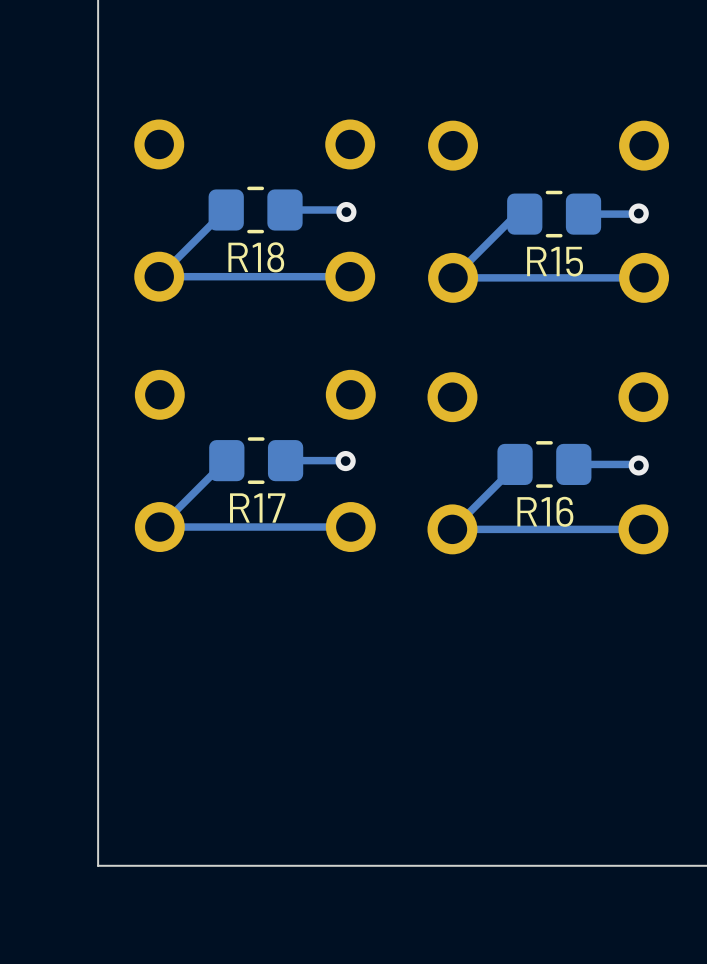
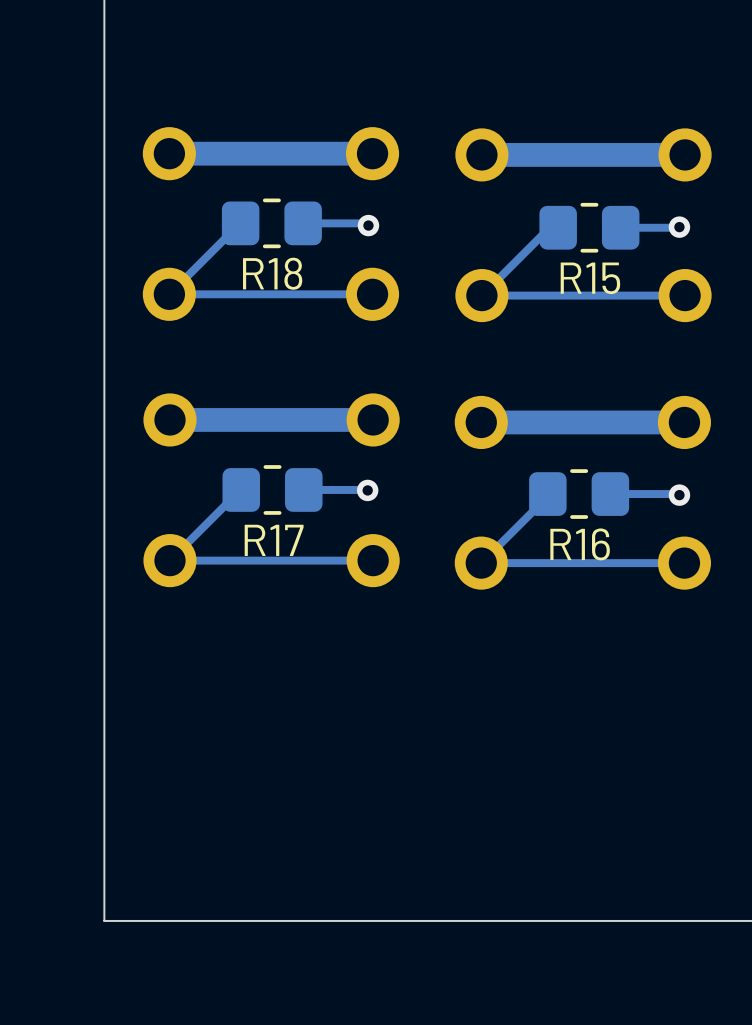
bottom track: none -> (372, 153) (169, 153)
bottom track: none -> (685, 154) (481, 154)
bottom track: none -> (373, 419) (170, 419)
bottom track: none -> (684, 422) (481, 422)

